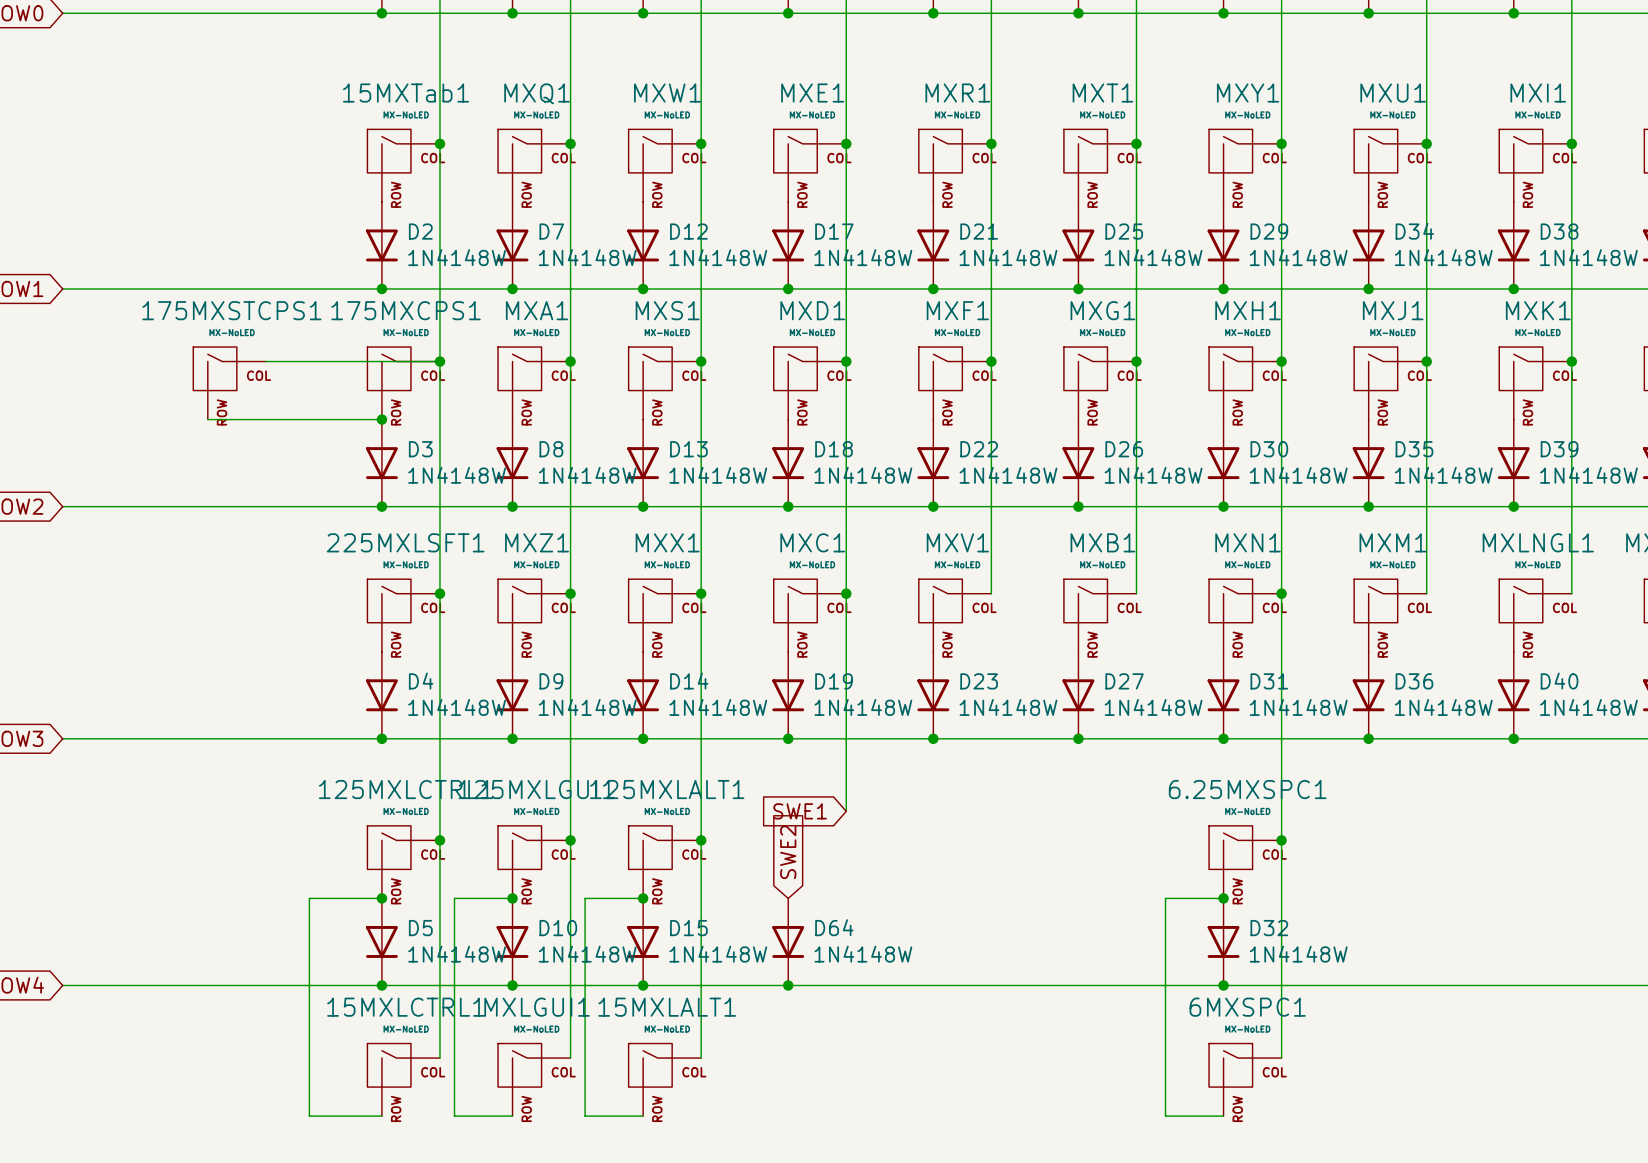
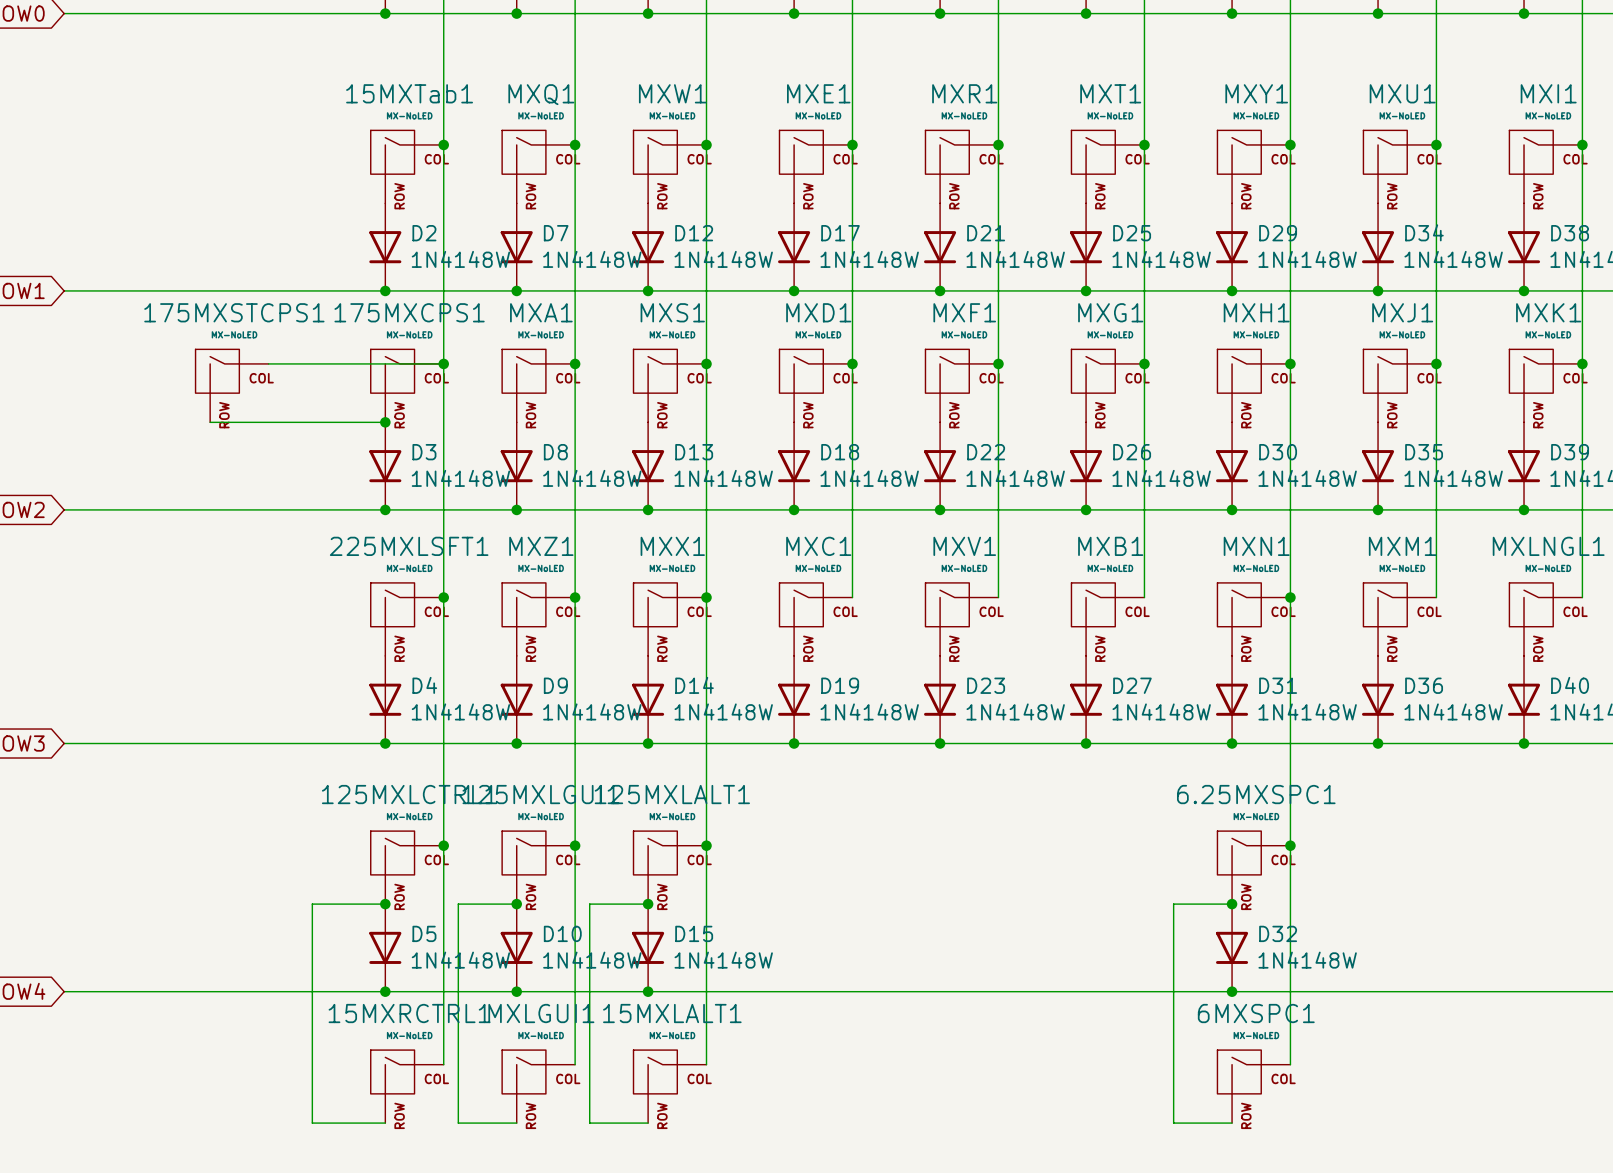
wire: (846, 593) (846, 811) -> none
junction: (846, 593) -> none
global label: SWE1 (800, 811) -> none
global label: SWE2 (788, 852) -> none
D64: 1N4148W (788, 941) -> none
junction: (788, 985) -> none
15MXLCTRL1 name: 15MXLCTRL1 (406, 1007) -> 15MXRCTRL1 (409, 1013)

